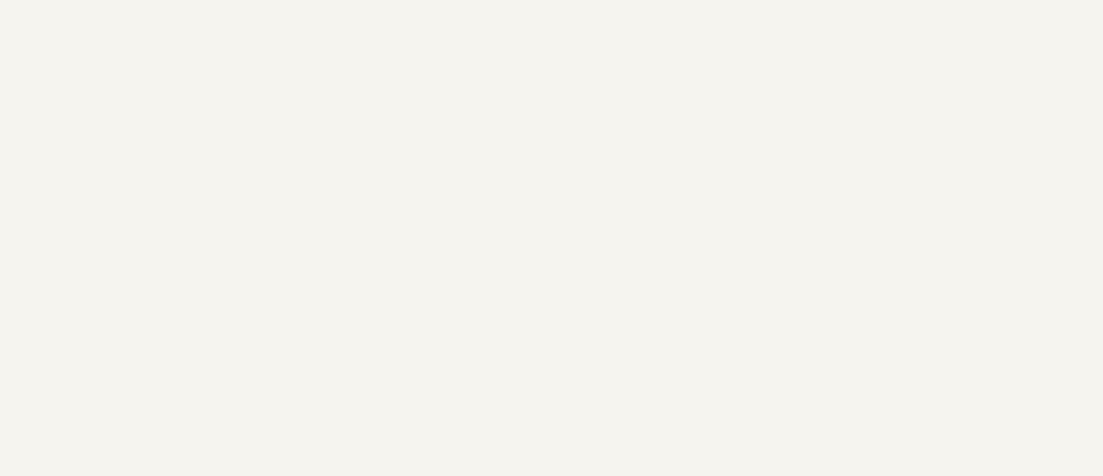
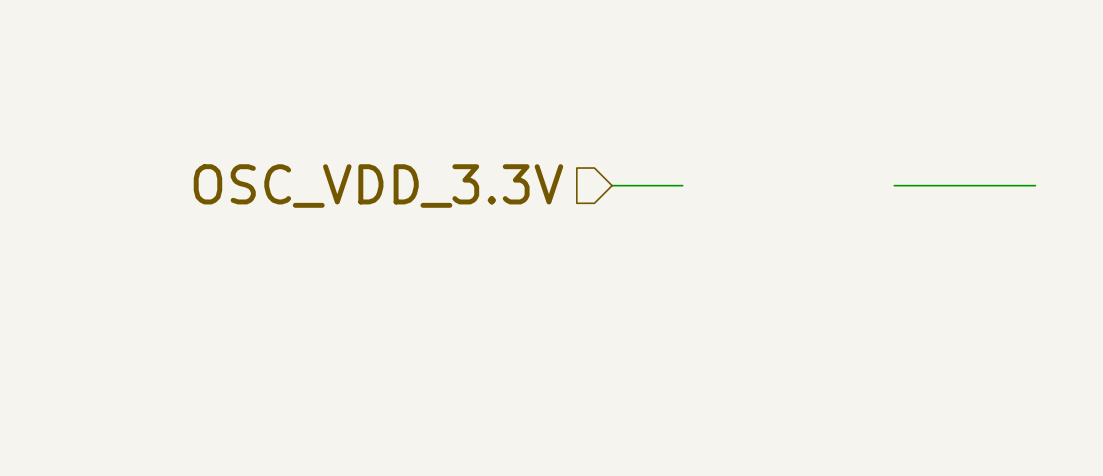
wire: none -> (612, 185) (682, 185)
wire: none -> (894, 185) (1035, 185)
hierarchical label: none -> OSC_VDD_3.3V (378, 186)

